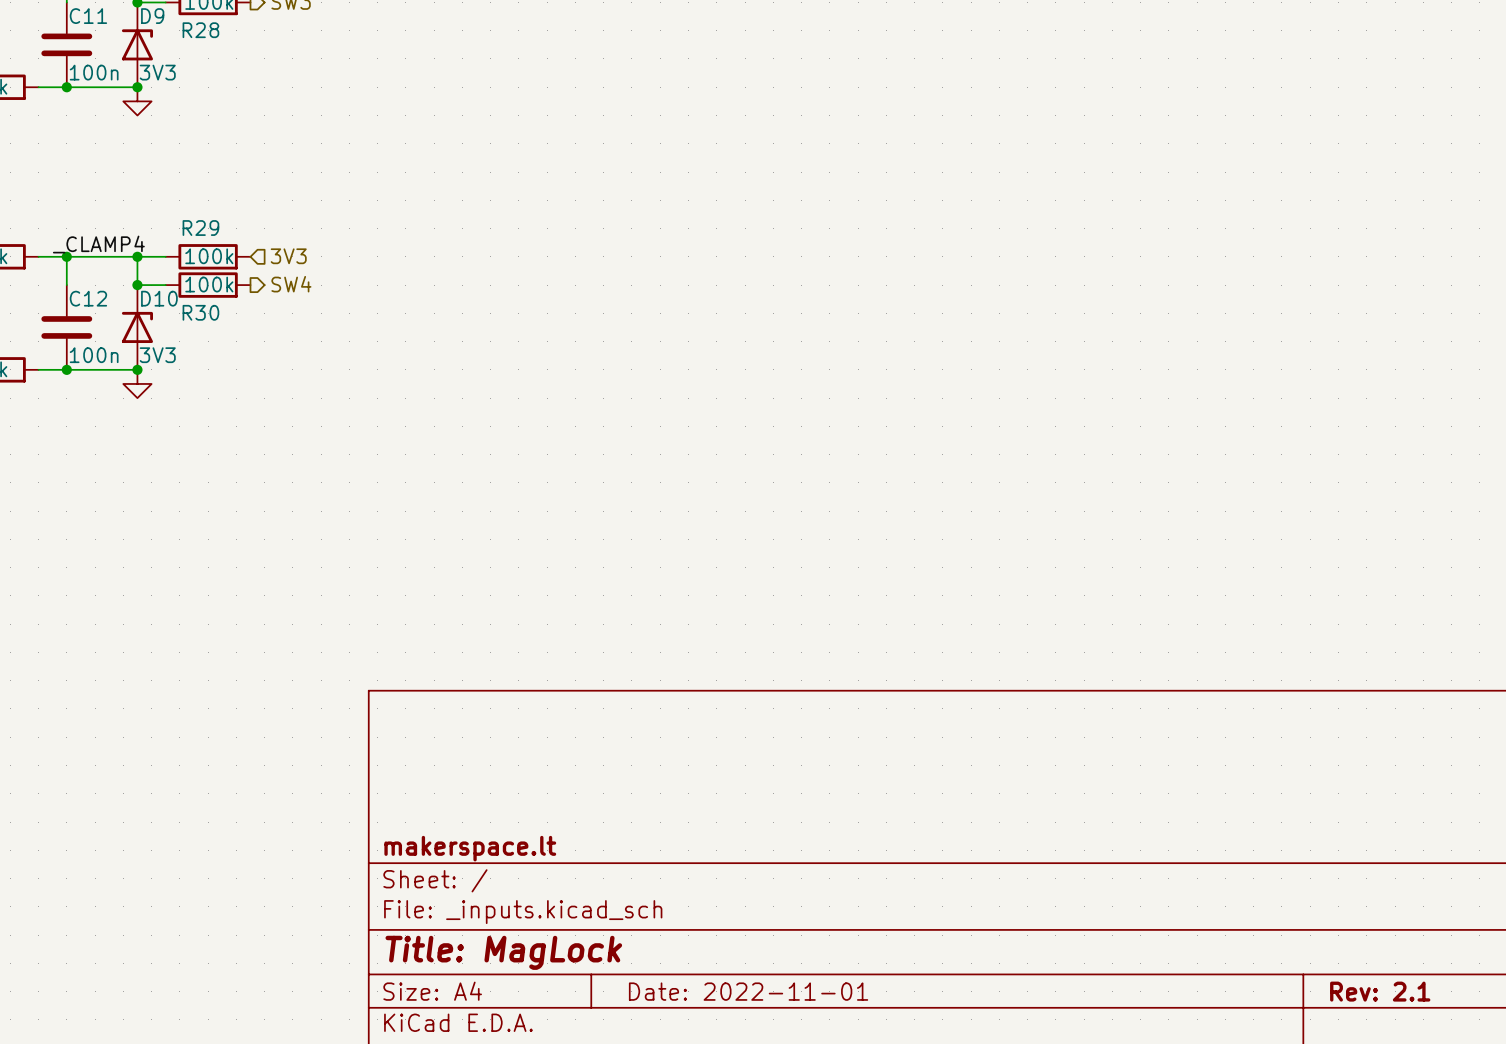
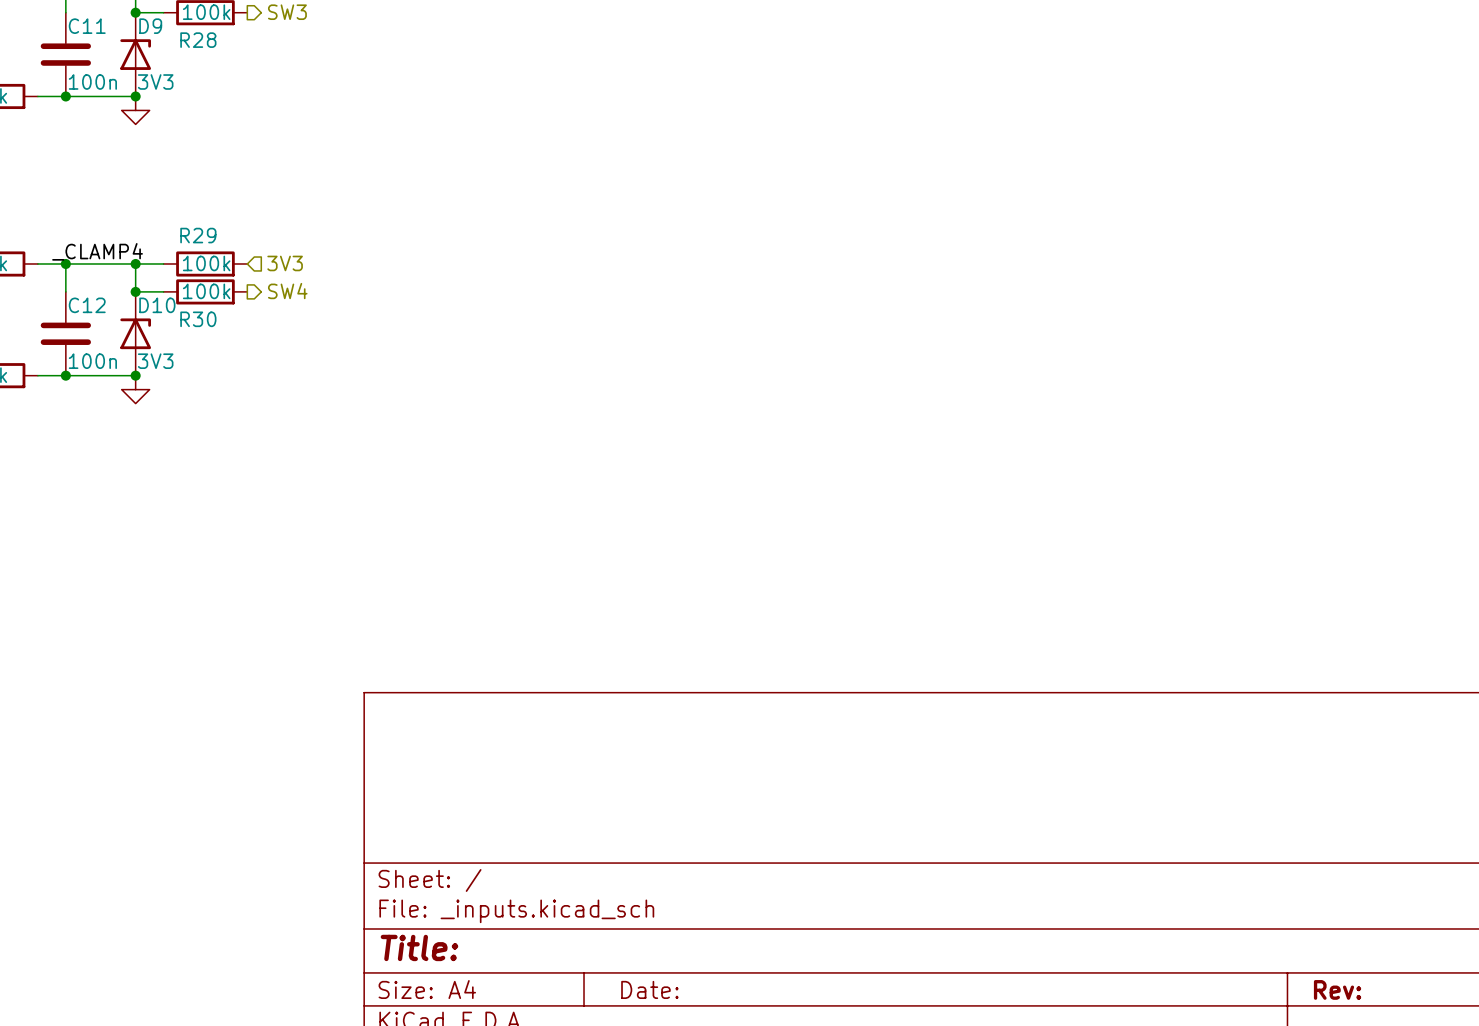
title block: makerspace.lt (470, 848) -> none
title block: Title: MagLock (503, 952) -> Title: (419, 947)
title block: Date: 2022-11-01 (748, 991) -> Date: (649, 989)
title block: Rev: 2.1 (1380, 991) -> Rev: (1337, 989)

